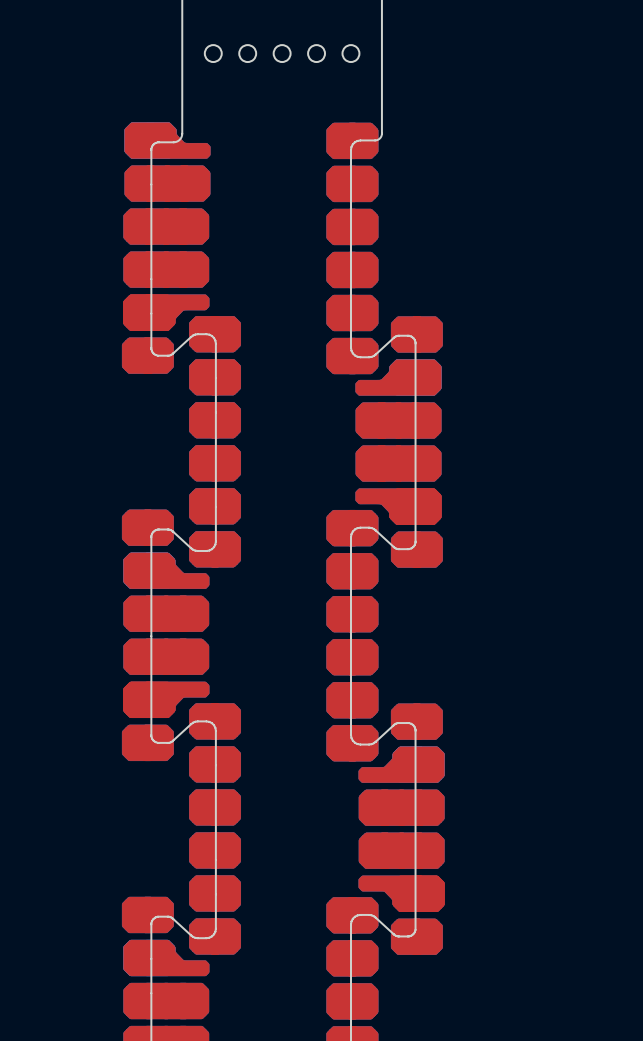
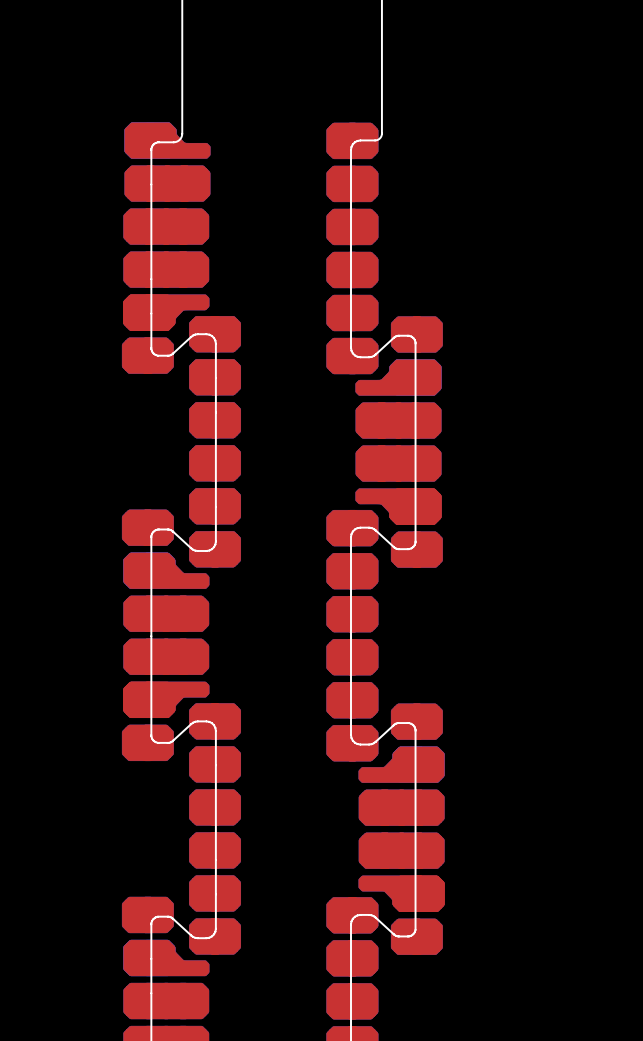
round board edge: [203, 44, 223, 63] -> none
round board edge: [238, 44, 258, 63] -> none
round board edge: [272, 44, 292, 63] -> none
round board edge: [307, 44, 326, 63] -> none
round board edge: [341, 44, 361, 63] -> none

